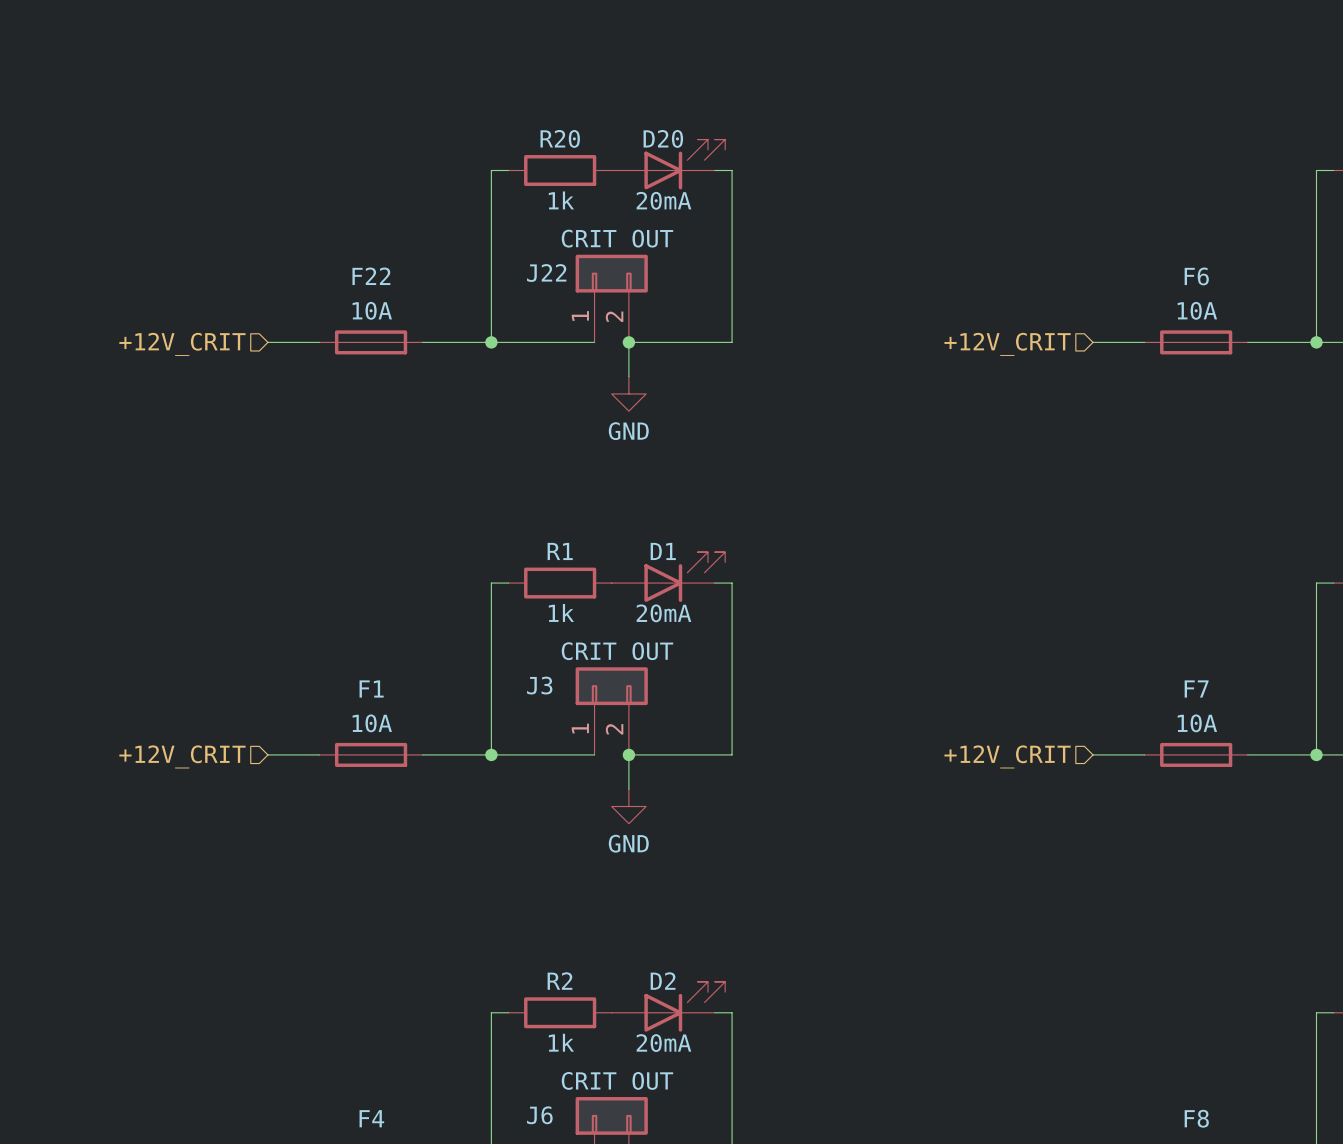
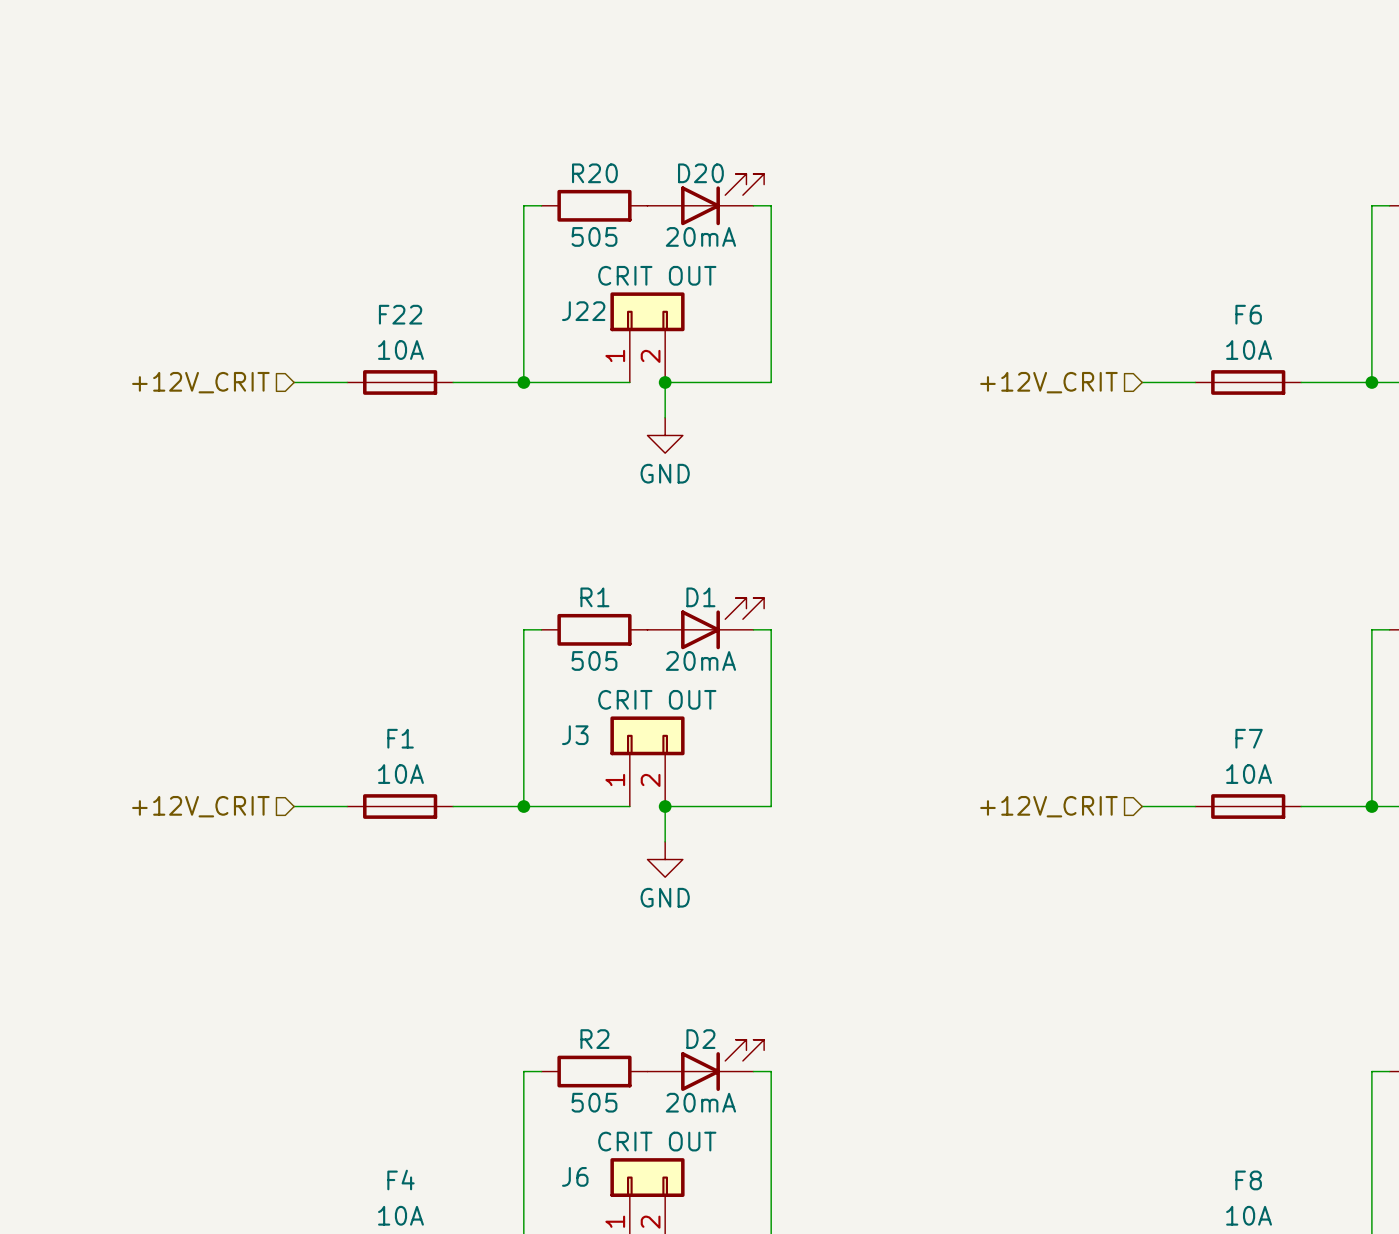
R20 value: 1k (561, 200) -> 505 (594, 236)
R1 value: 1k (561, 612) -> 505 (594, 660)
R2 value: 1k (561, 1042) -> 505 (594, 1102)

